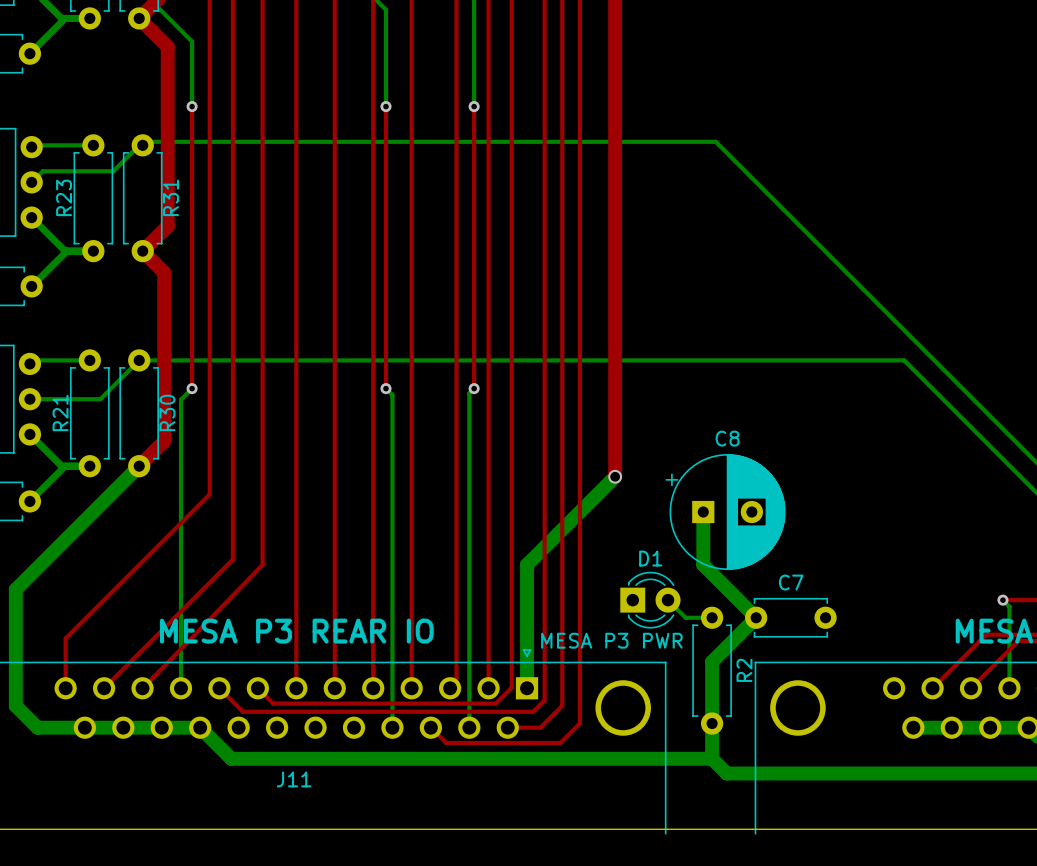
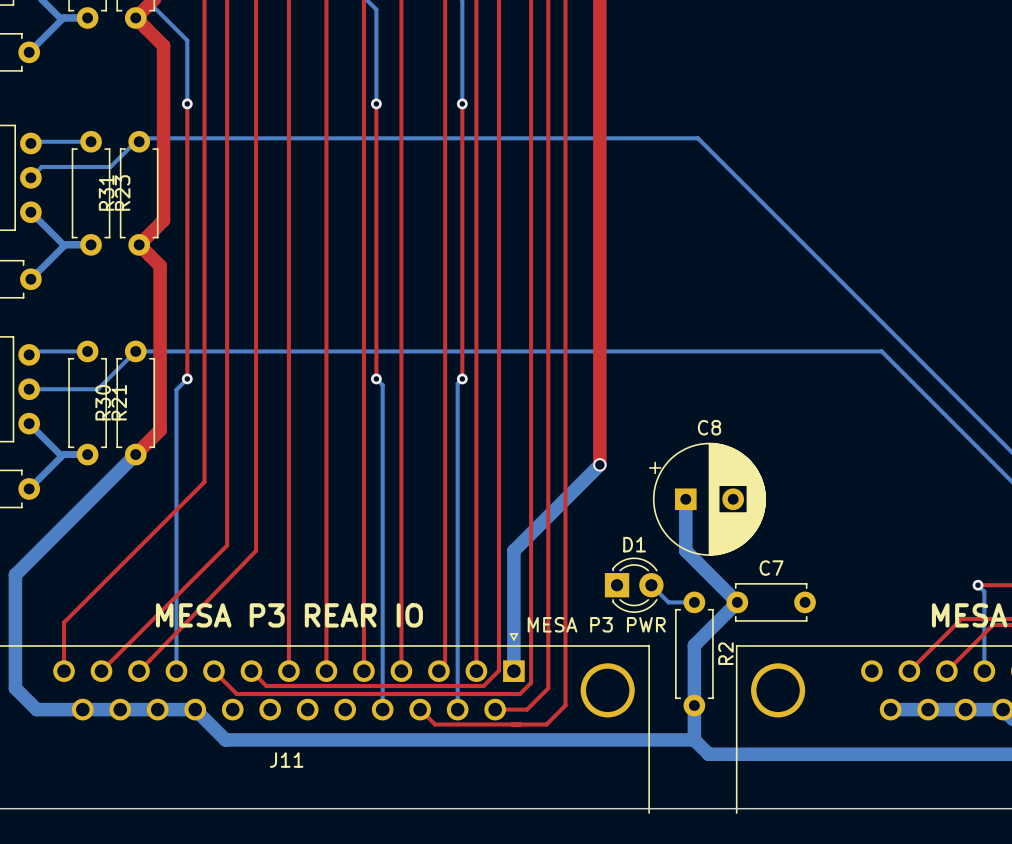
R23 name position: R23 (64, 197) -> R23 (122, 192)
R31 name position: R31 (171, 197) -> R31 (106, 192)
R21 name position: R21 (60, 412) -> R21 (119, 402)
R30 name position: R30 (167, 412) -> R30 (103, 402)

